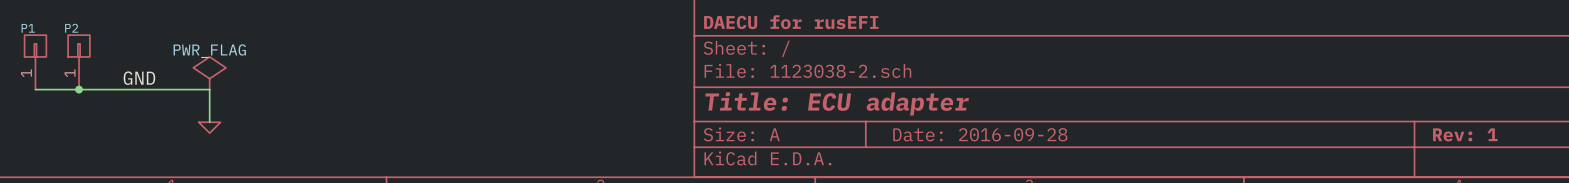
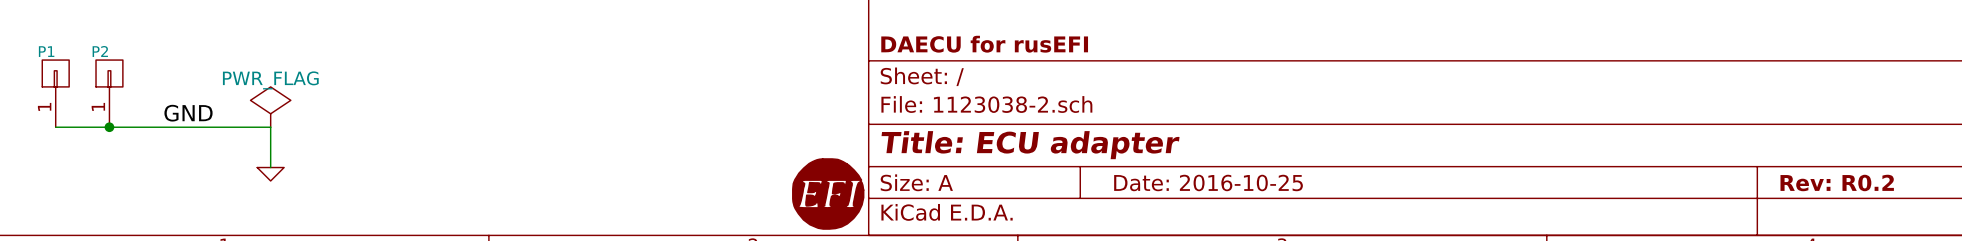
title block: Date: 2016-09-28 (980, 134) -> Date: 2016-10-25 (1208, 182)
title block: Rev: 1 (1465, 134) -> Rev: R0.2 (1837, 182)
power symbol: none -> (828, 194)

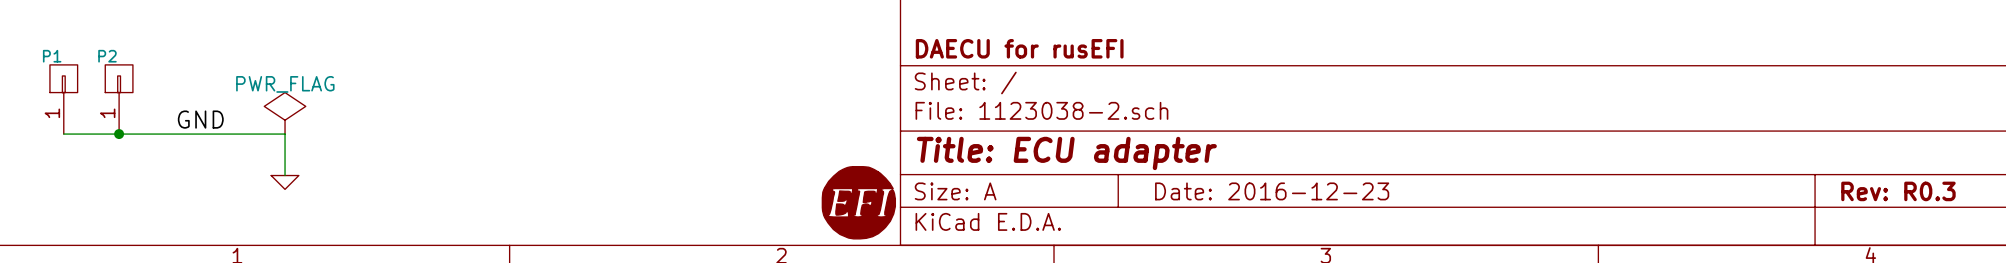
title block: Date: 2016-10-25 (1208, 182) -> Date: 2016-12-23 (1272, 191)
title block: Rev: R0.2 (1837, 182) -> Rev: R0.3 (1898, 191)

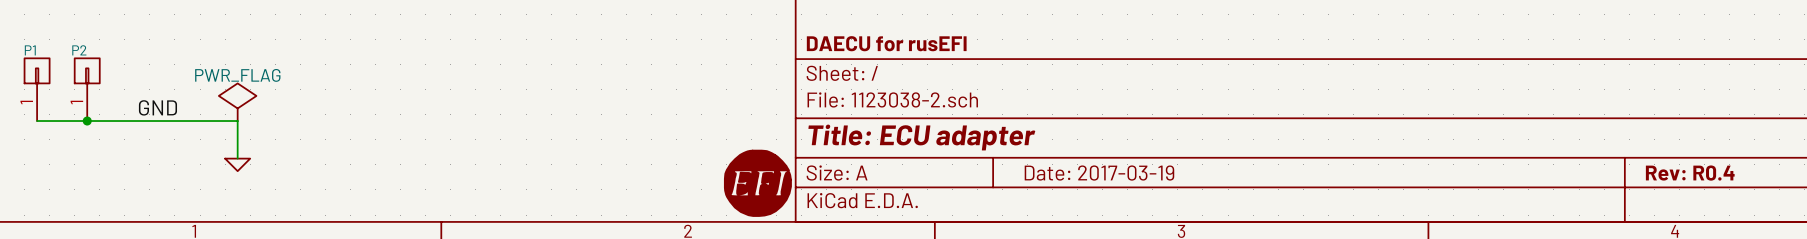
title block: Date: 2016-12-23 (1272, 191) -> Date: 2017-03-19 (1099, 173)
title block: Rev: R0.3 (1898, 191) -> Rev: R0.4 (1690, 173)

